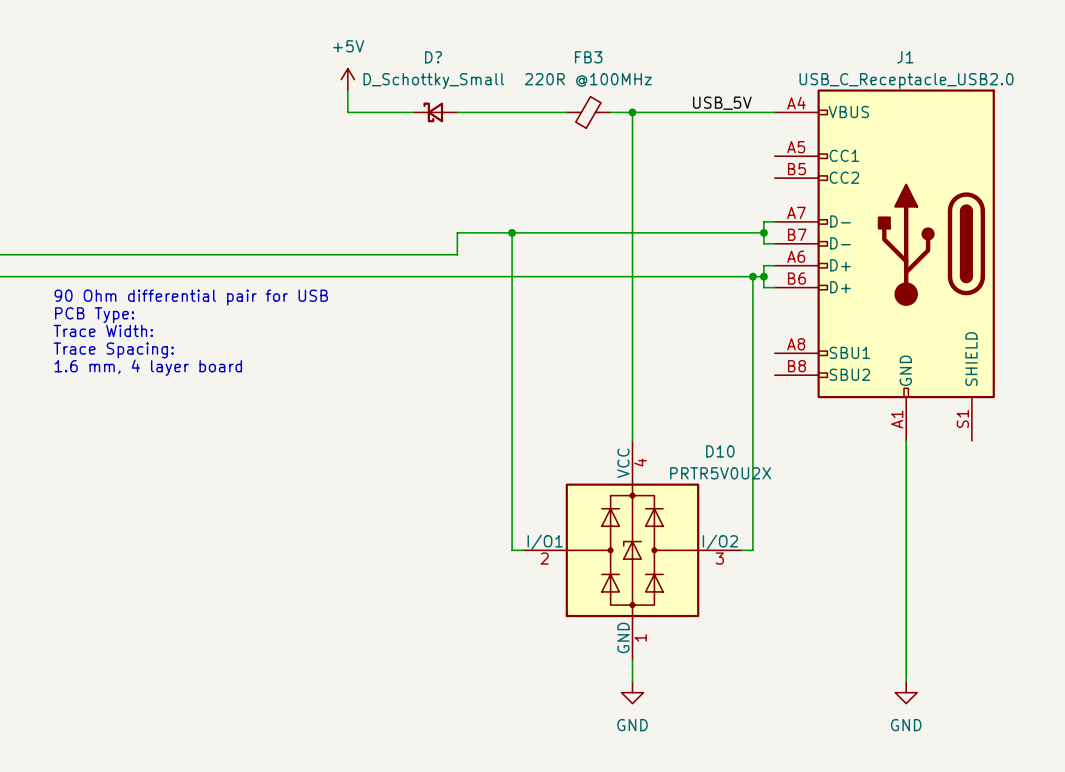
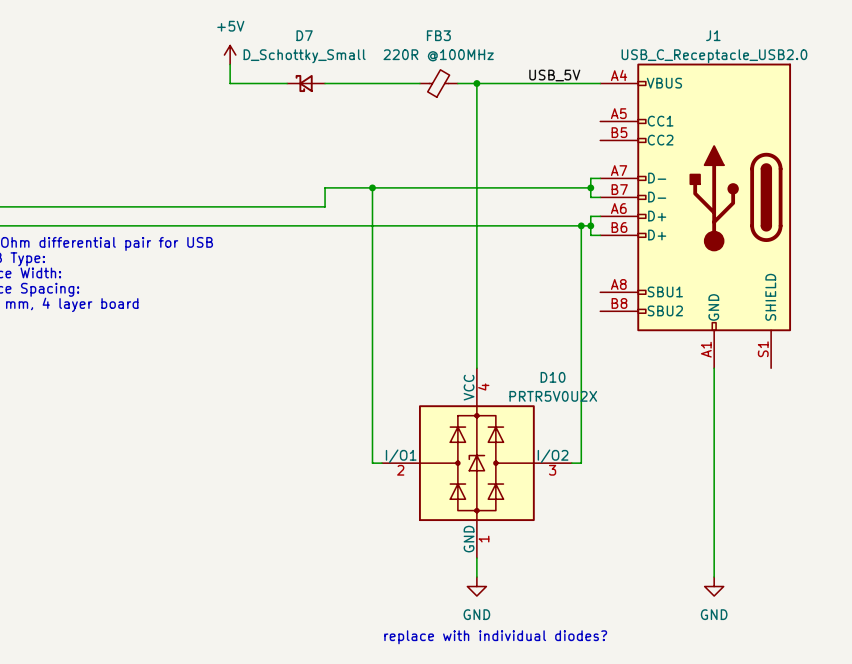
D? name: D? (433, 57) -> D7 (304, 35)
text: none -> replace with individual diodes? (495, 637)

